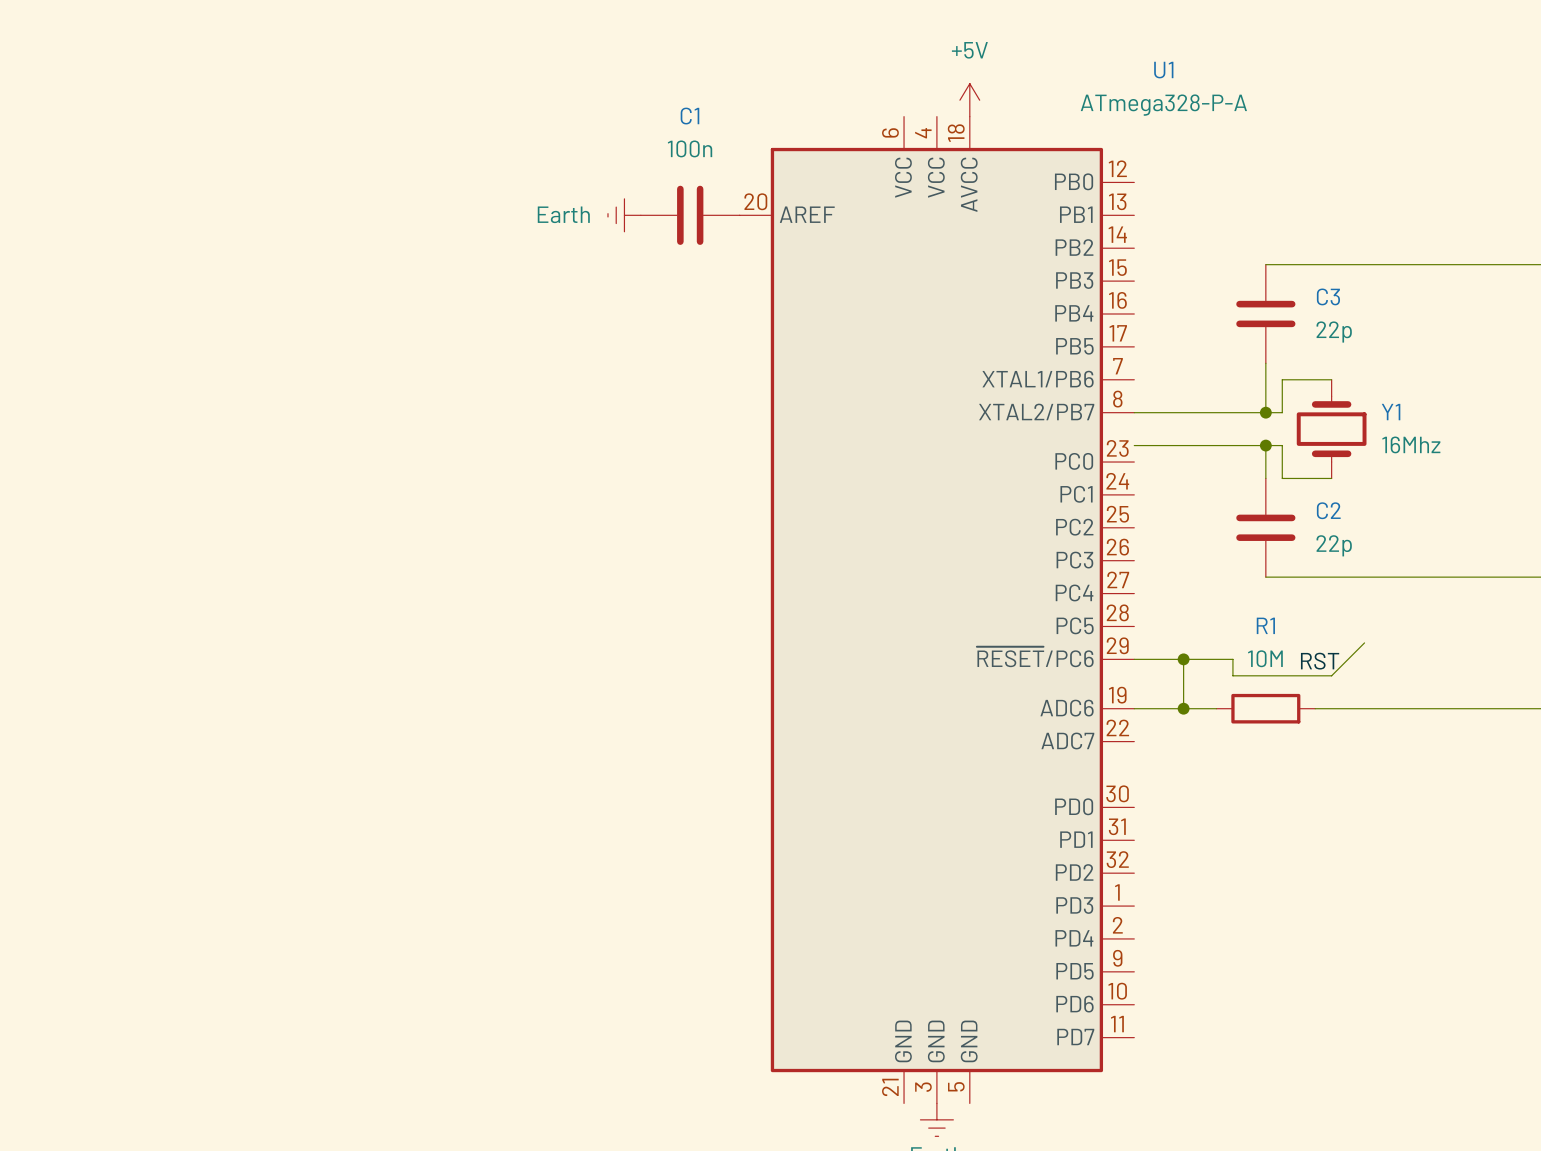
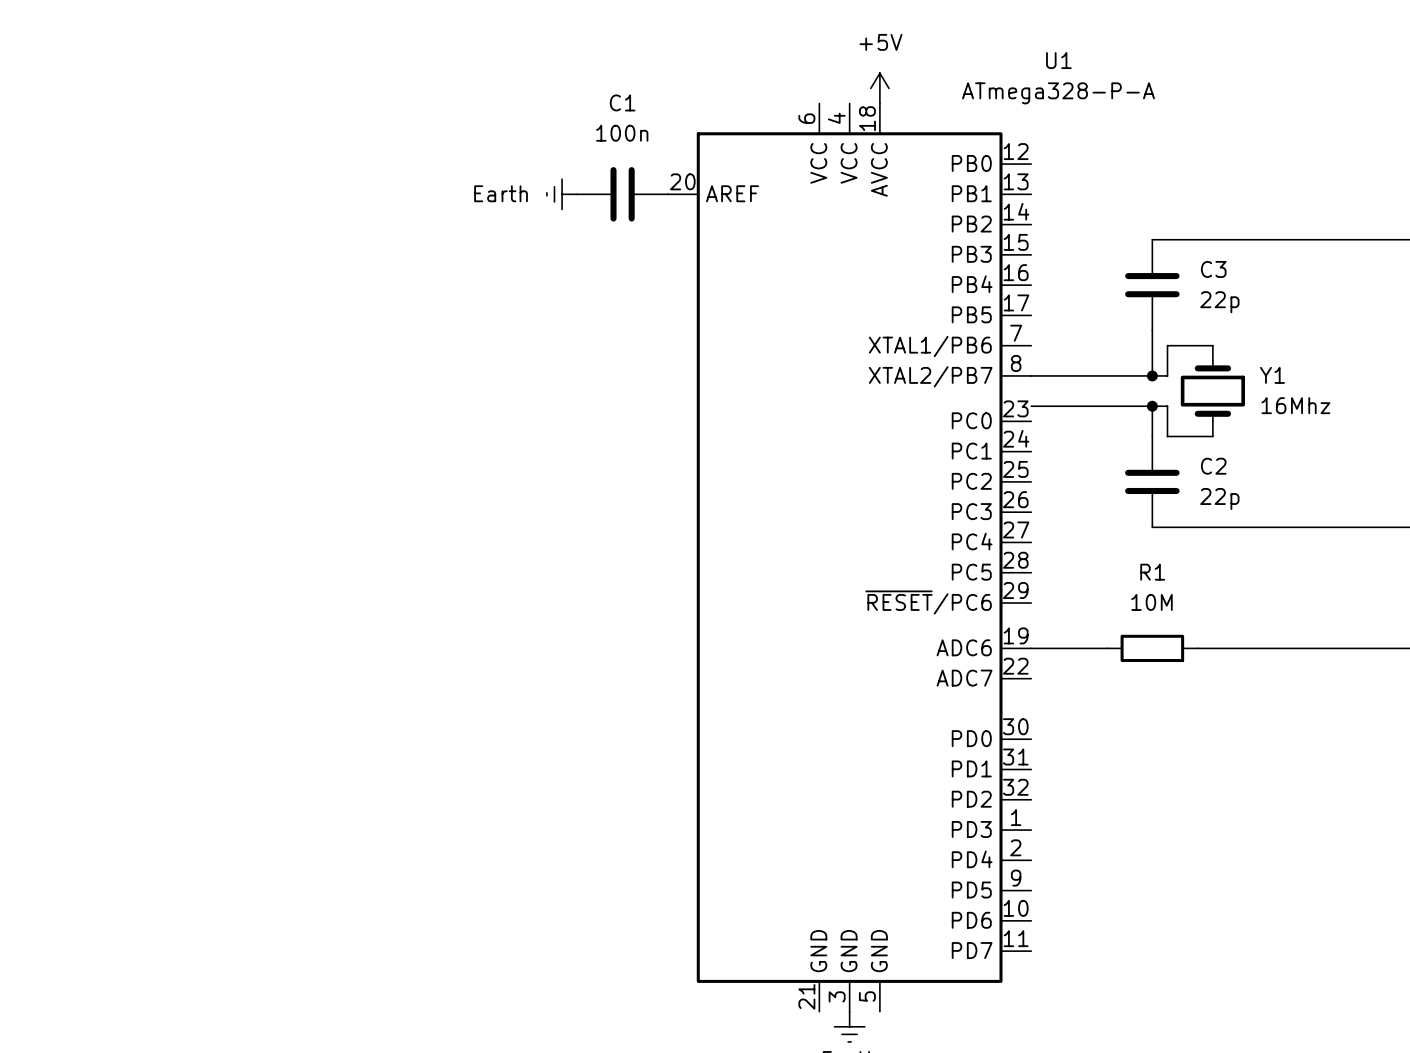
wire: (1364, 642) (1331, 675) (1232, 675) (1232, 659) (1134, 659) -> none
wire: (1183, 659) (1183, 708) -> none
junction: (1183, 659) -> none
label: RST (1320, 661) -> none
junction: (1183, 708) -> none

